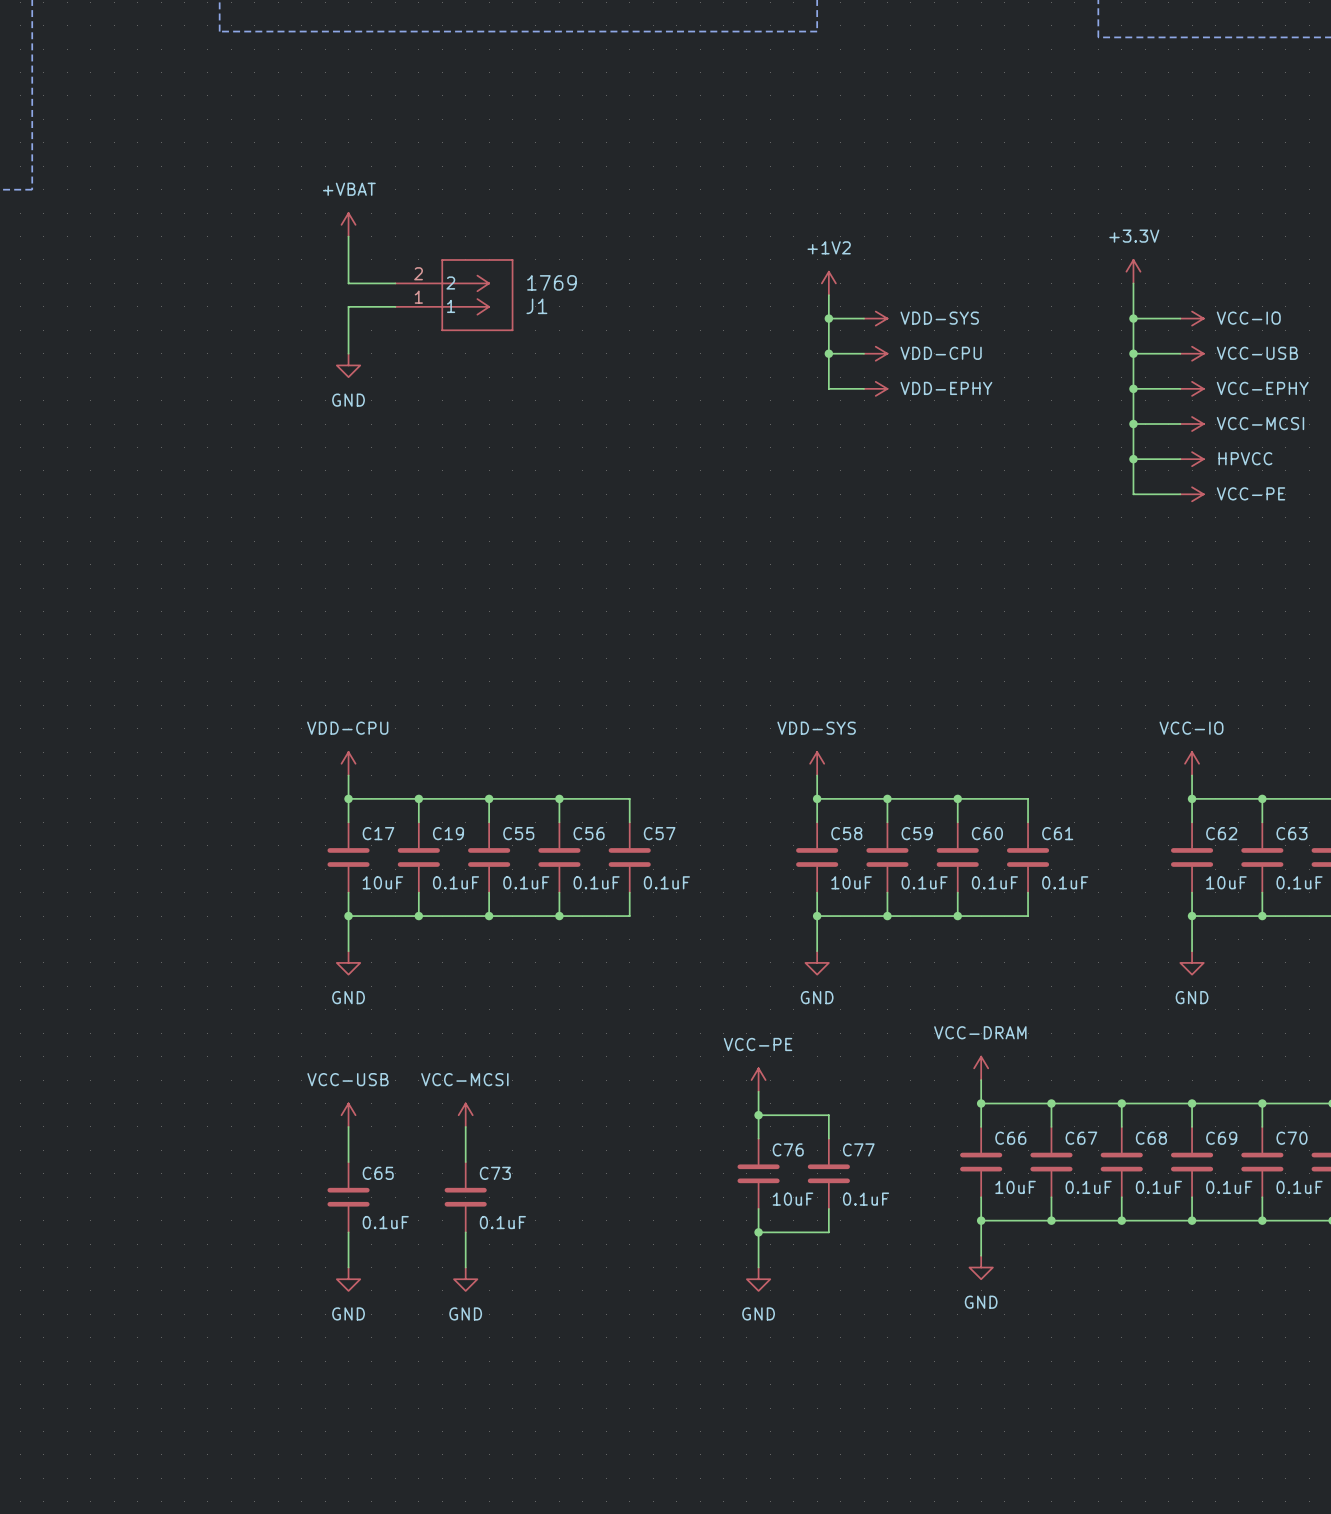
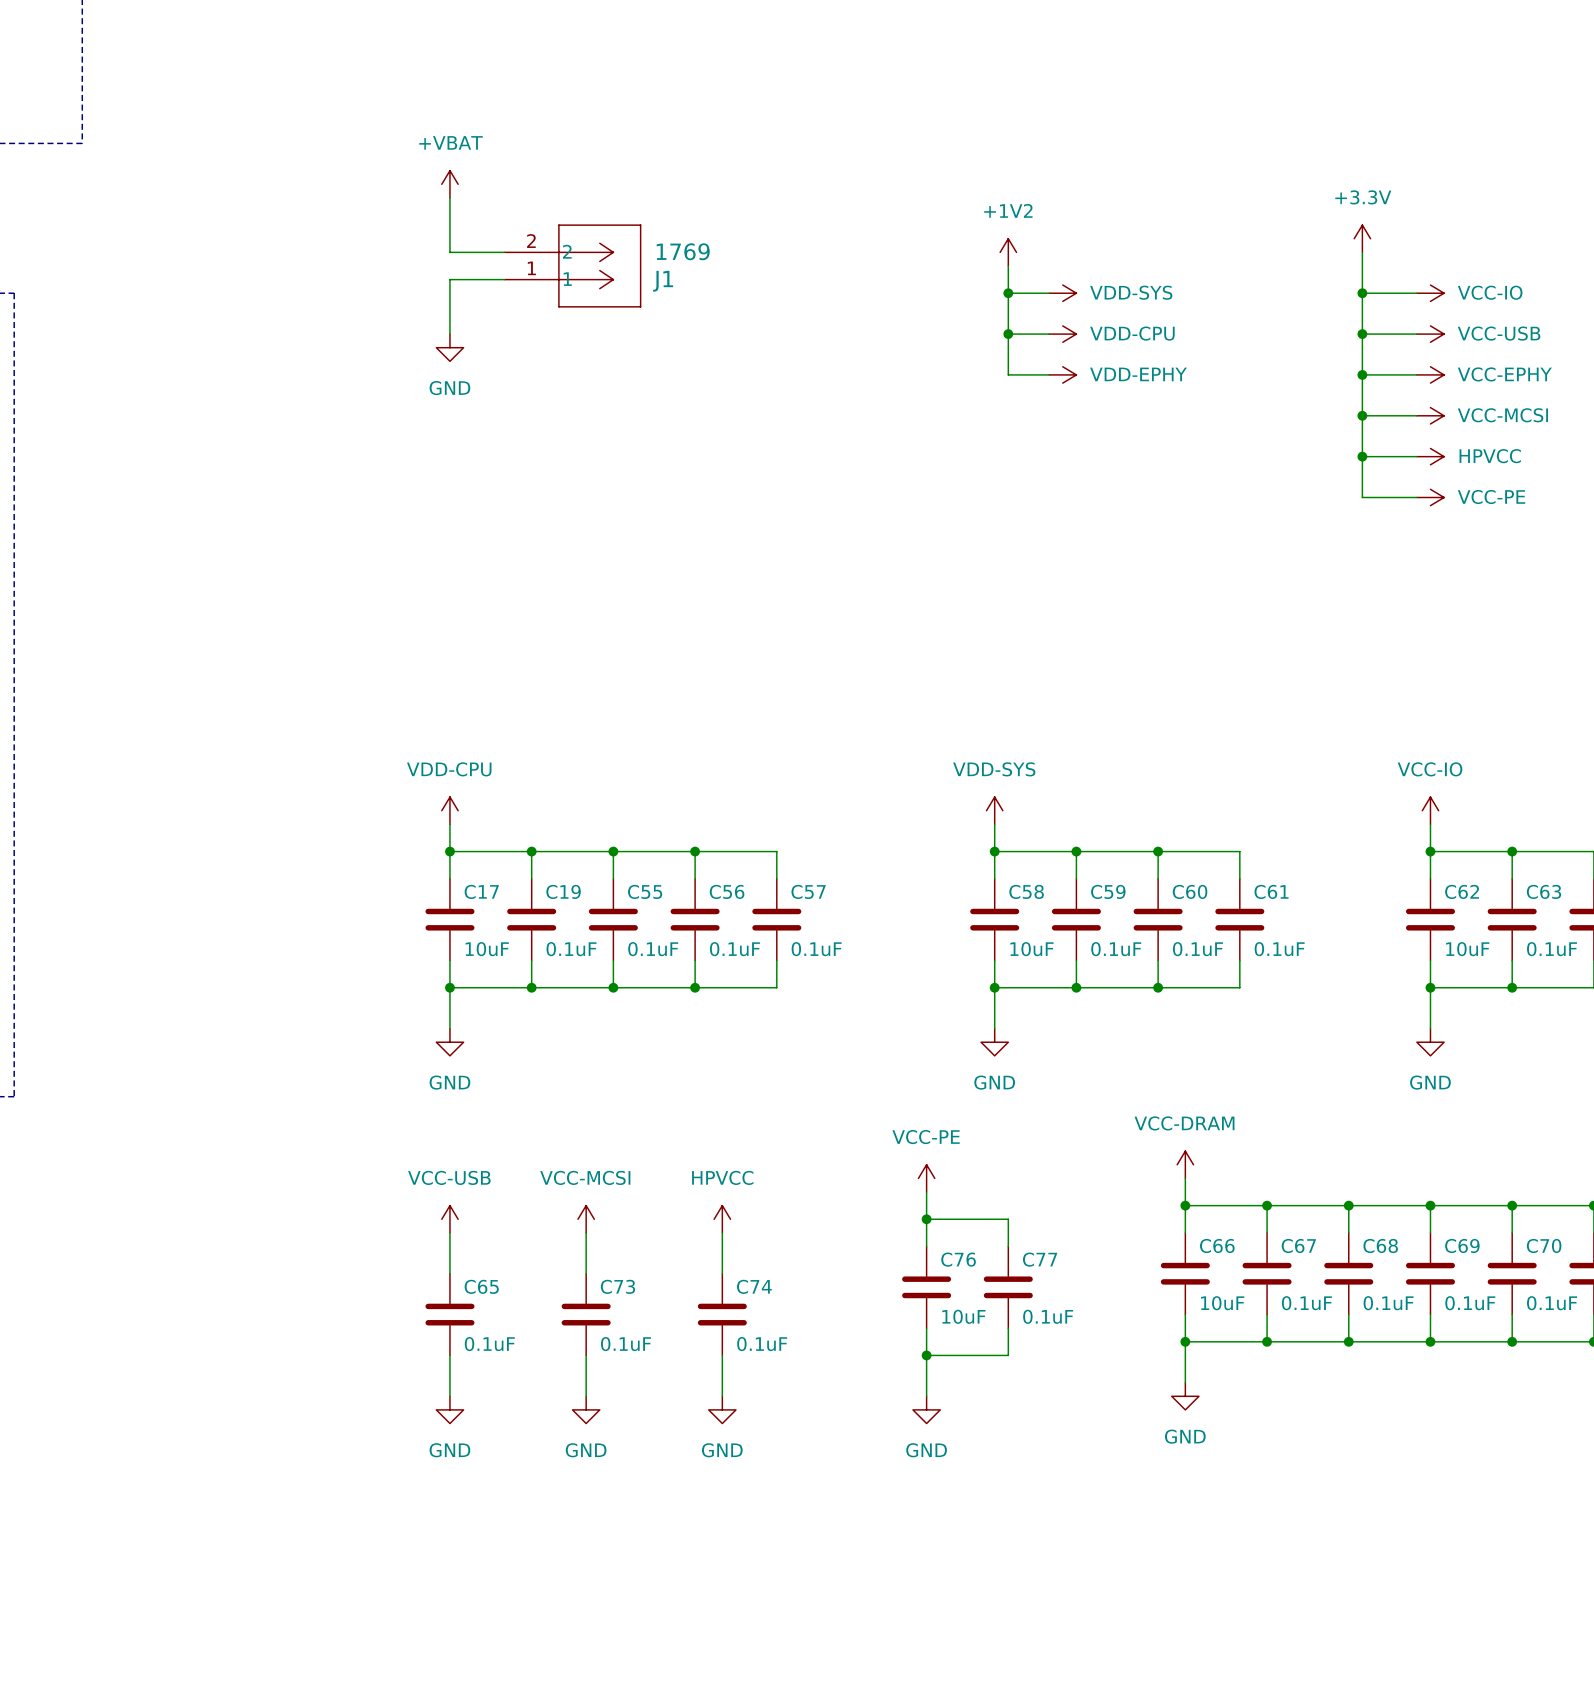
power symbol: none -> HPVCC (722, 1219)
wire: none -> (722, 1232) (722, 1273)
C74: none -> 0.1uF (722, 1314)
wire: none -> (722, 1355) (722, 1396)
power symbol: none -> GND (722, 1409)

